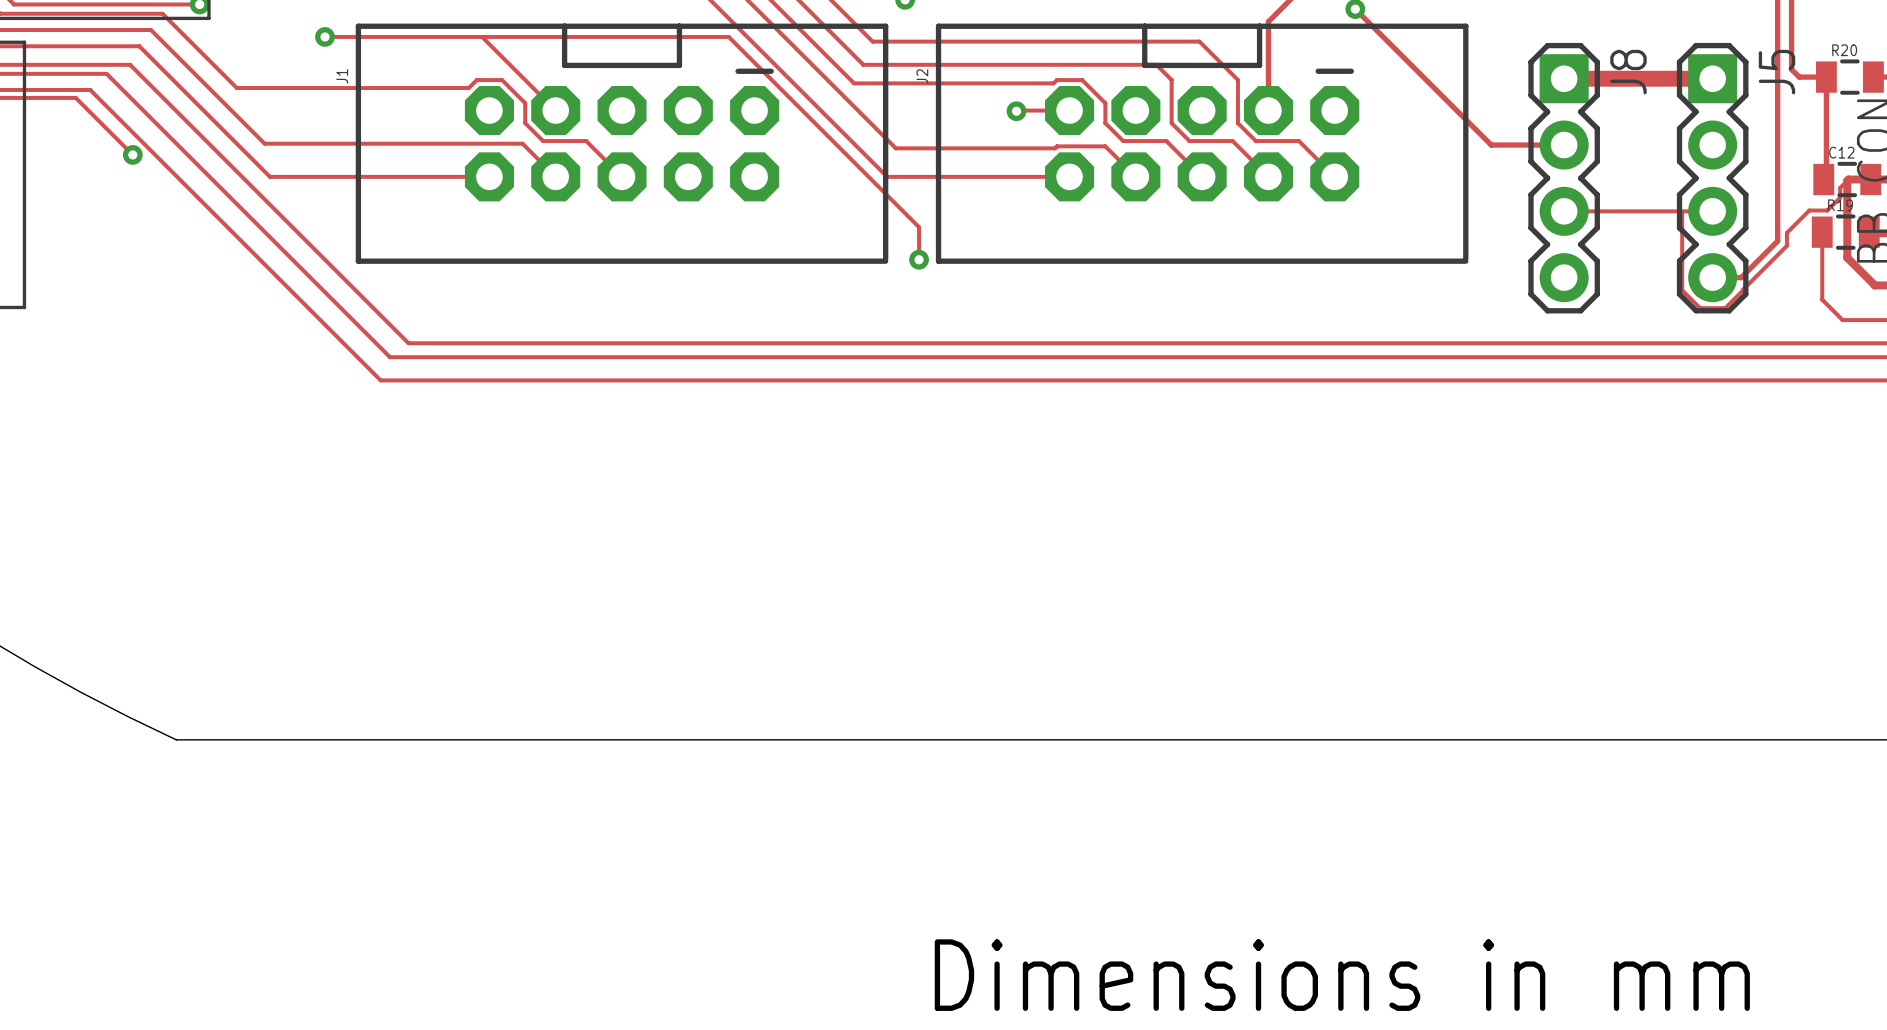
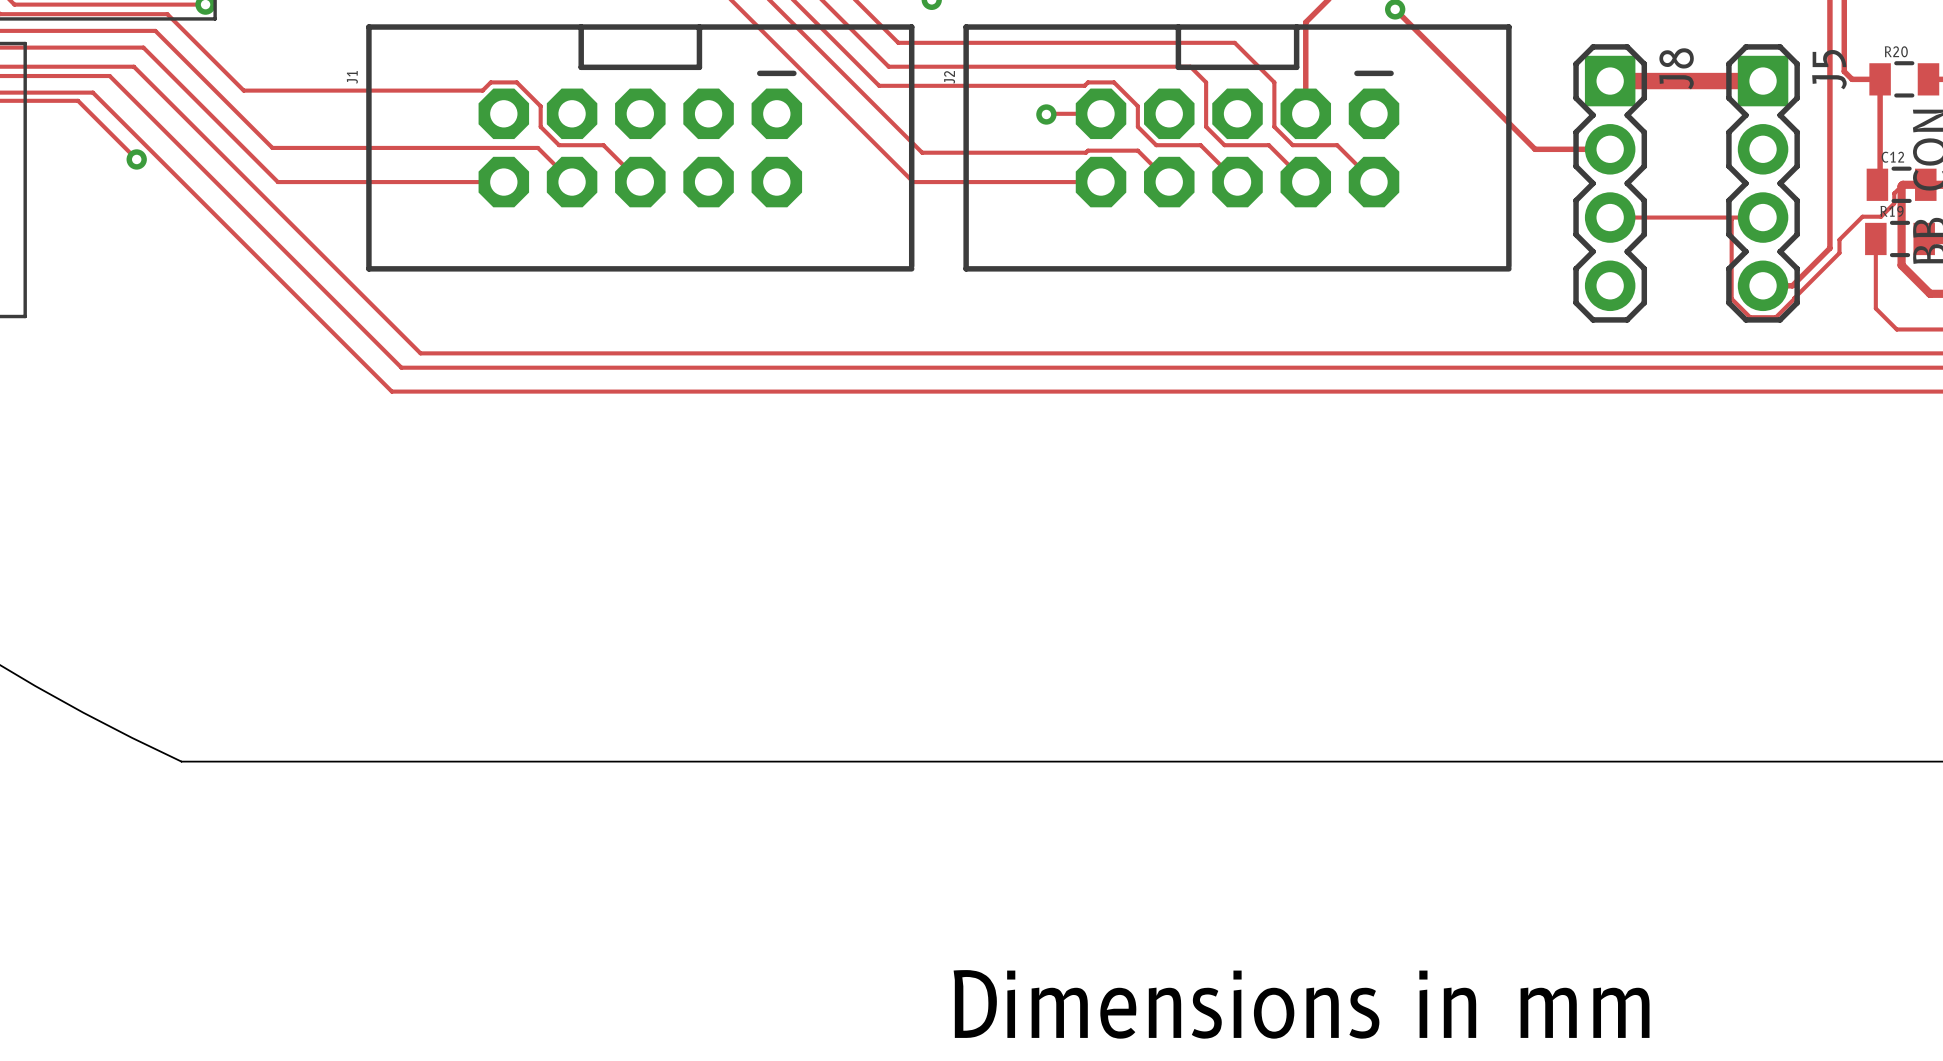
track: (325, 36) (728, 36) (919, 227) (919, 259) -> none
via: (325, 36) -> none
track: (482, 36) (555, 110) -> none
via: (919, 259) -> none

